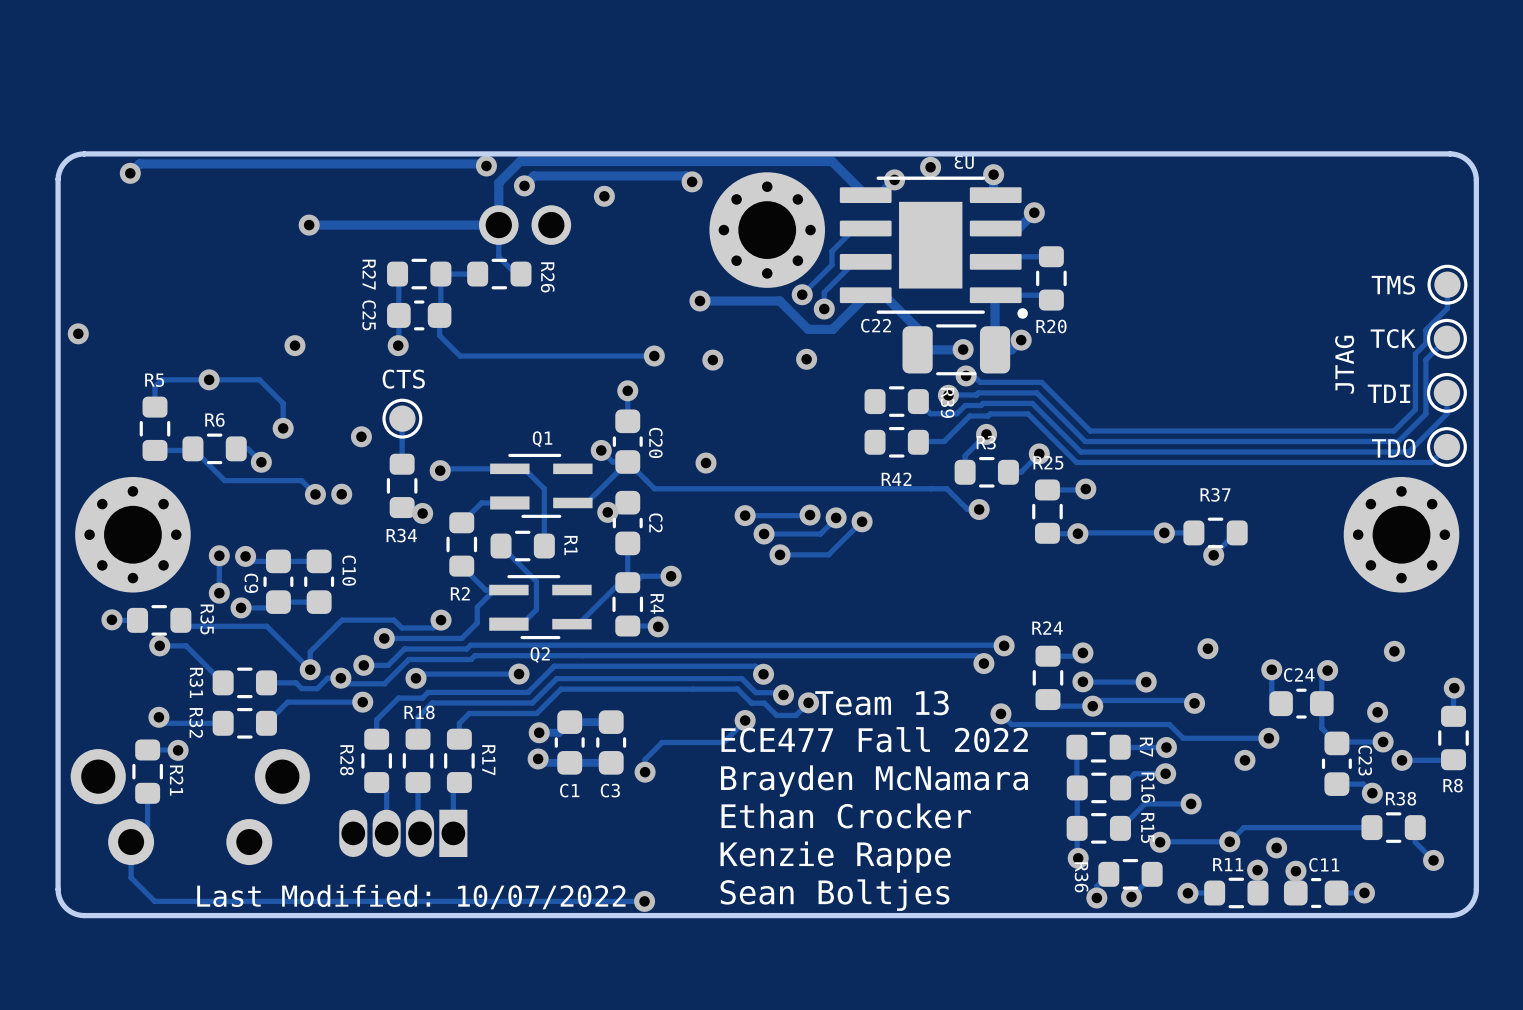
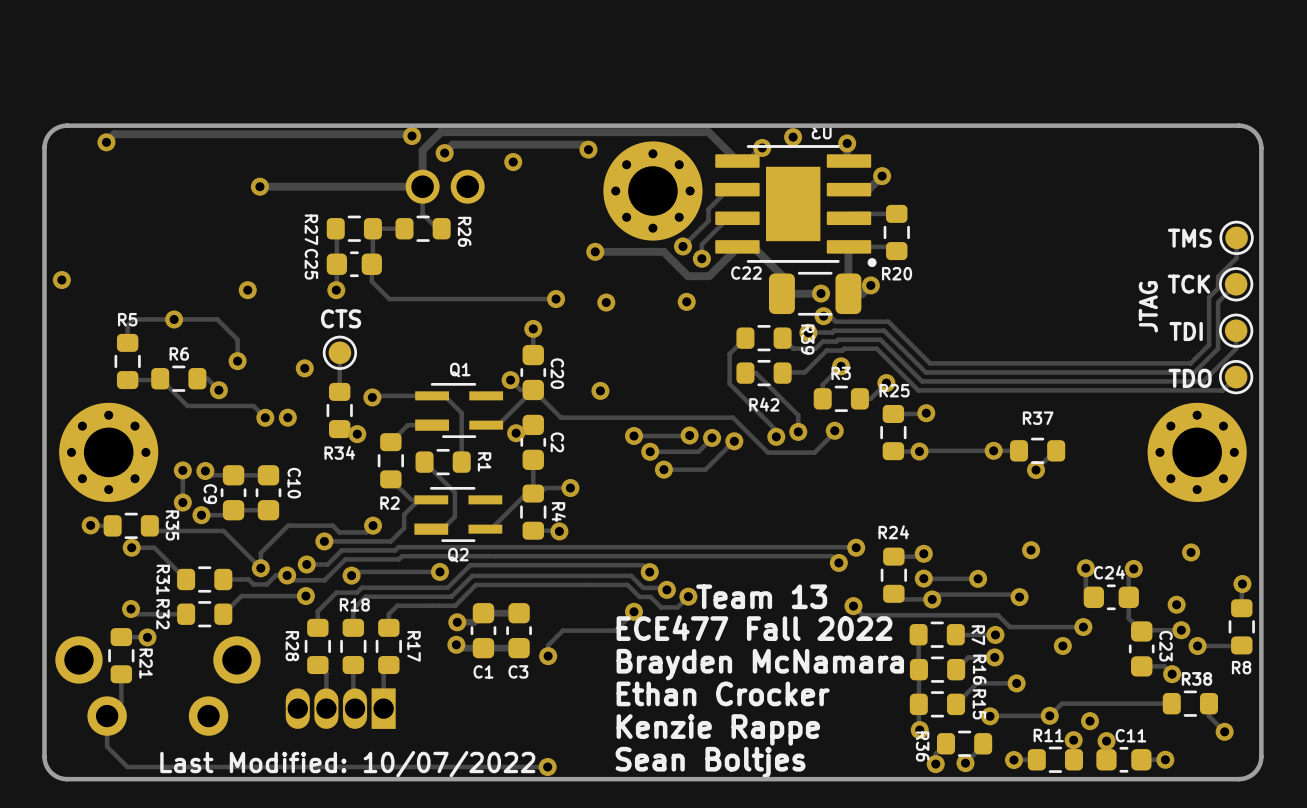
track: none -> (745, 338) (729, 353) (729, 383) (776, 430) (776, 436)
track: none -> (745, 373) (755, 373) (798, 415) (798, 431)
track: (654, 488) (946, 488) (967, 509) (979, 509) -> (556, 412) (560, 417) (733, 417) (767, 452) (814, 452) (834, 430)
via: none -> (798, 431)
via: none -> (776, 436)

